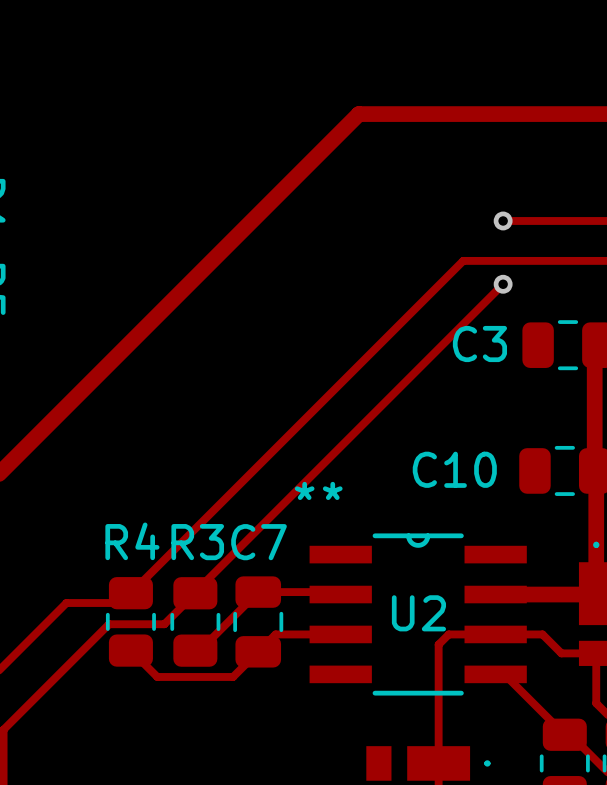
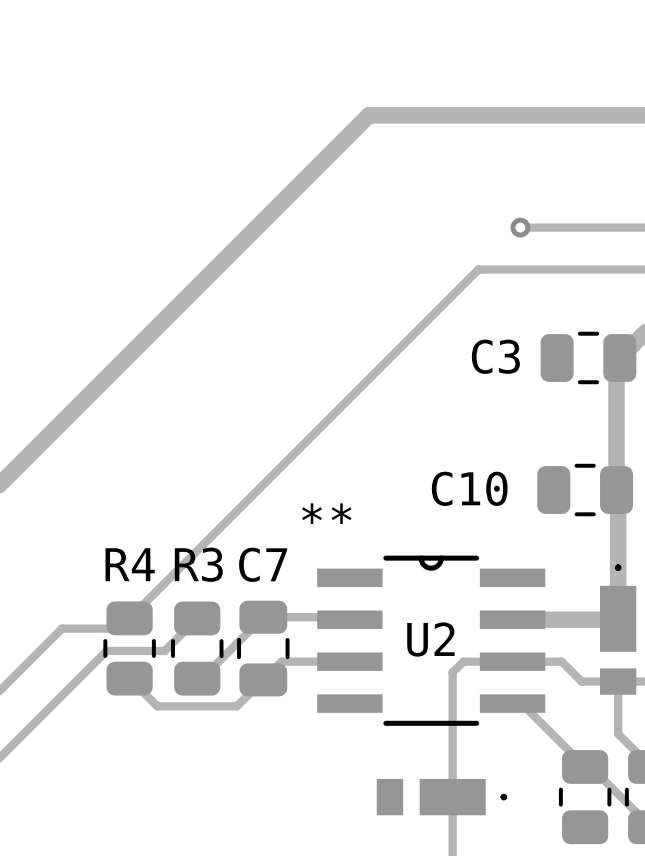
track: (503, 284) (195, 593) -> none
via: (503, 284) -> none

